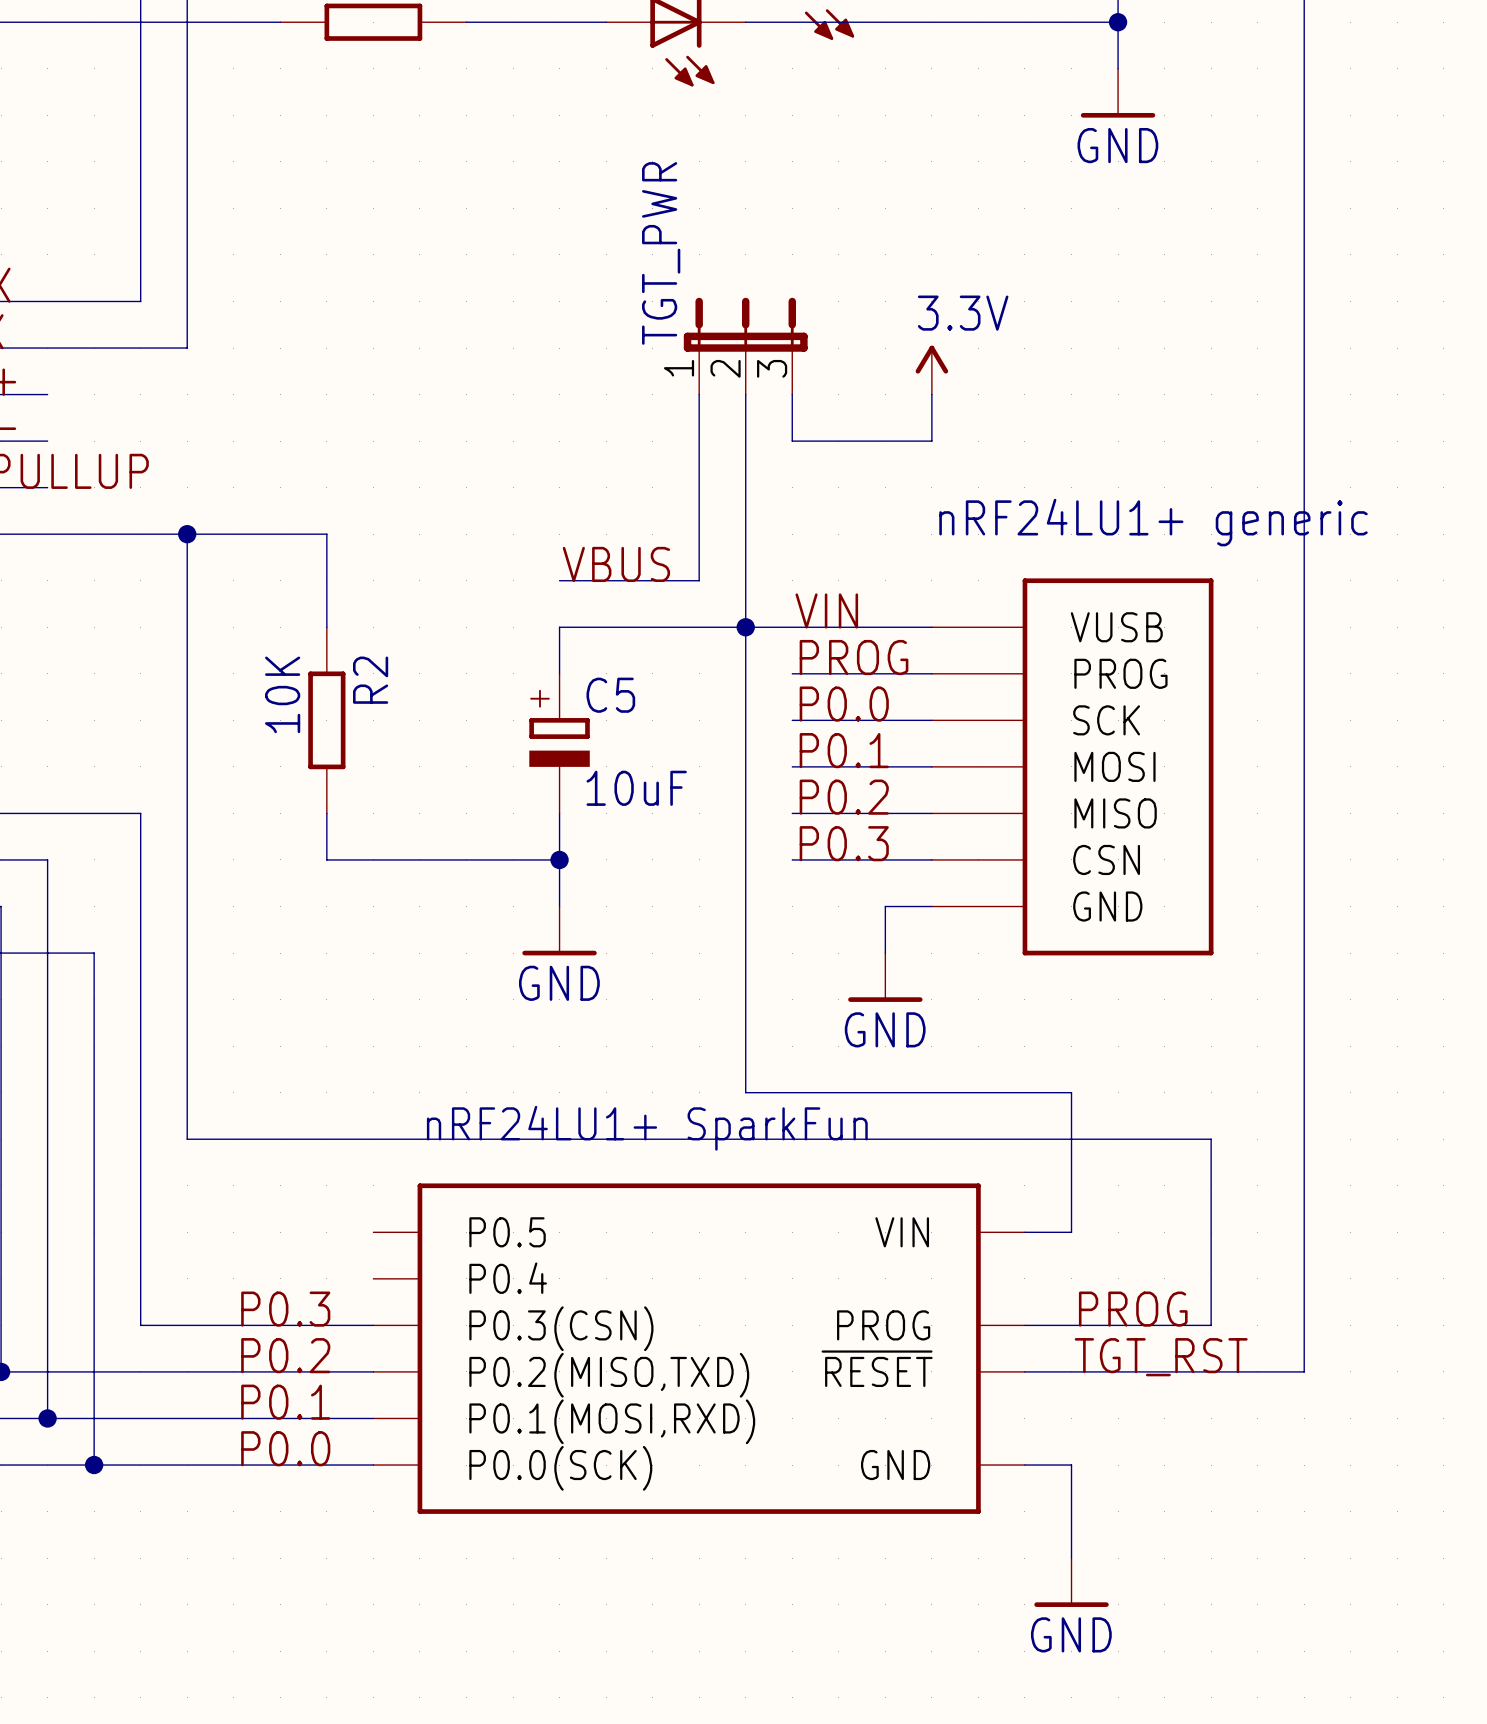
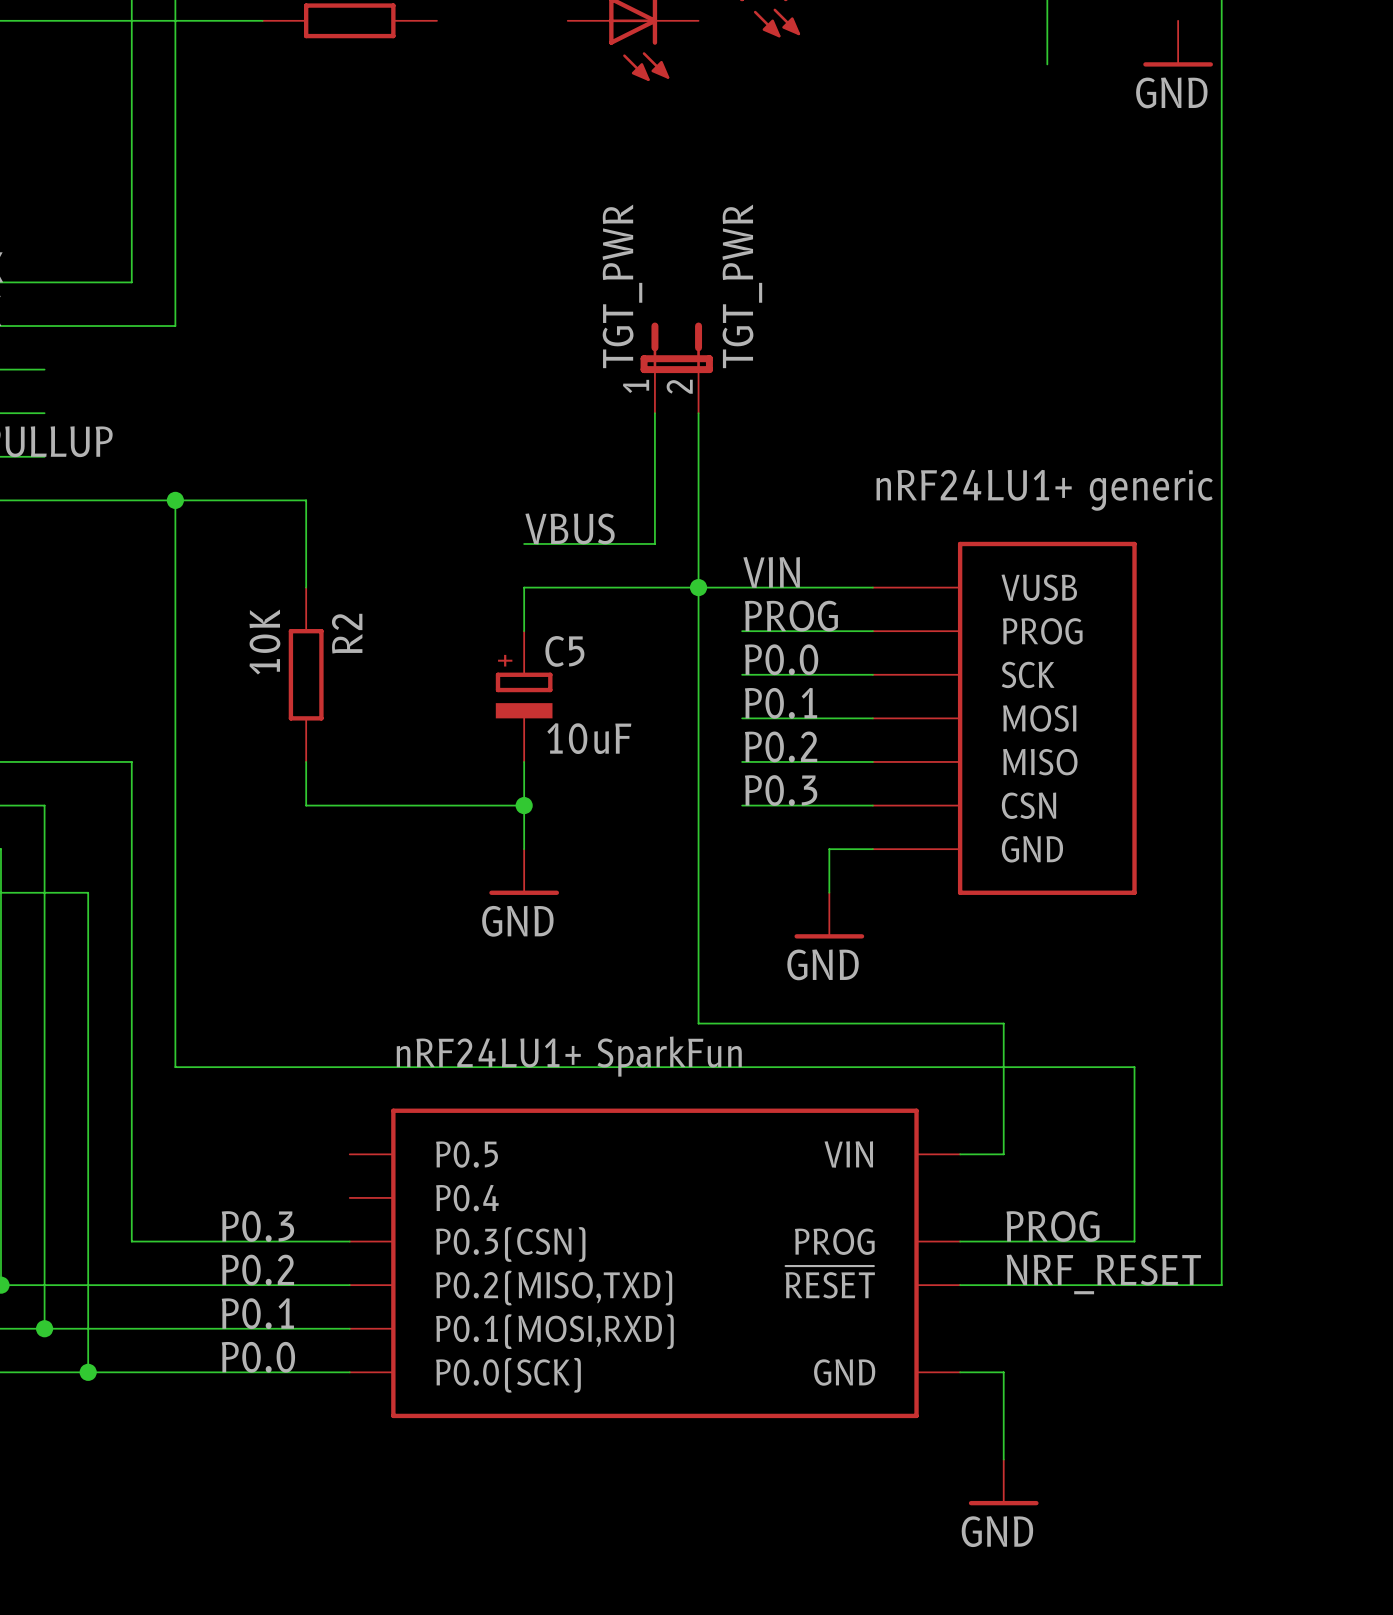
wire: (466, 22) (606, 22) -> none
wire: (745, 22) (1118, 22) -> none
junction: (1118, 22) -> none
power symbol position: GND (1118, 93) -> GND (1178, 43)
TGT_PWR: (745, 346) -> none
power symbol: 3.3V (931, 370) -> none
TGT_PWR: none -> TGT_PWR (676, 367)
wire: (792, 394) (792, 441) (931, 441) (931, 394) -> none
label: TGT_RST (1161, 1357) -> NRF_RESET (1103, 1274)

